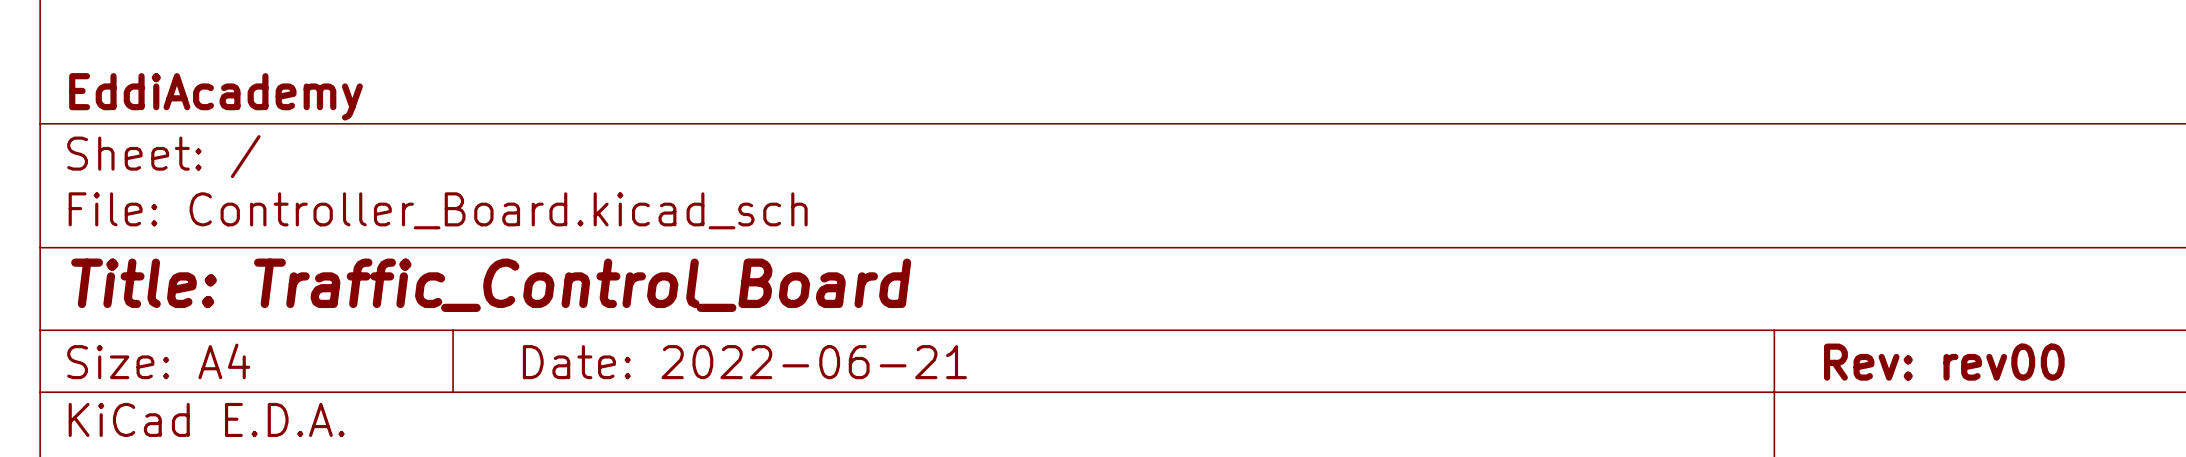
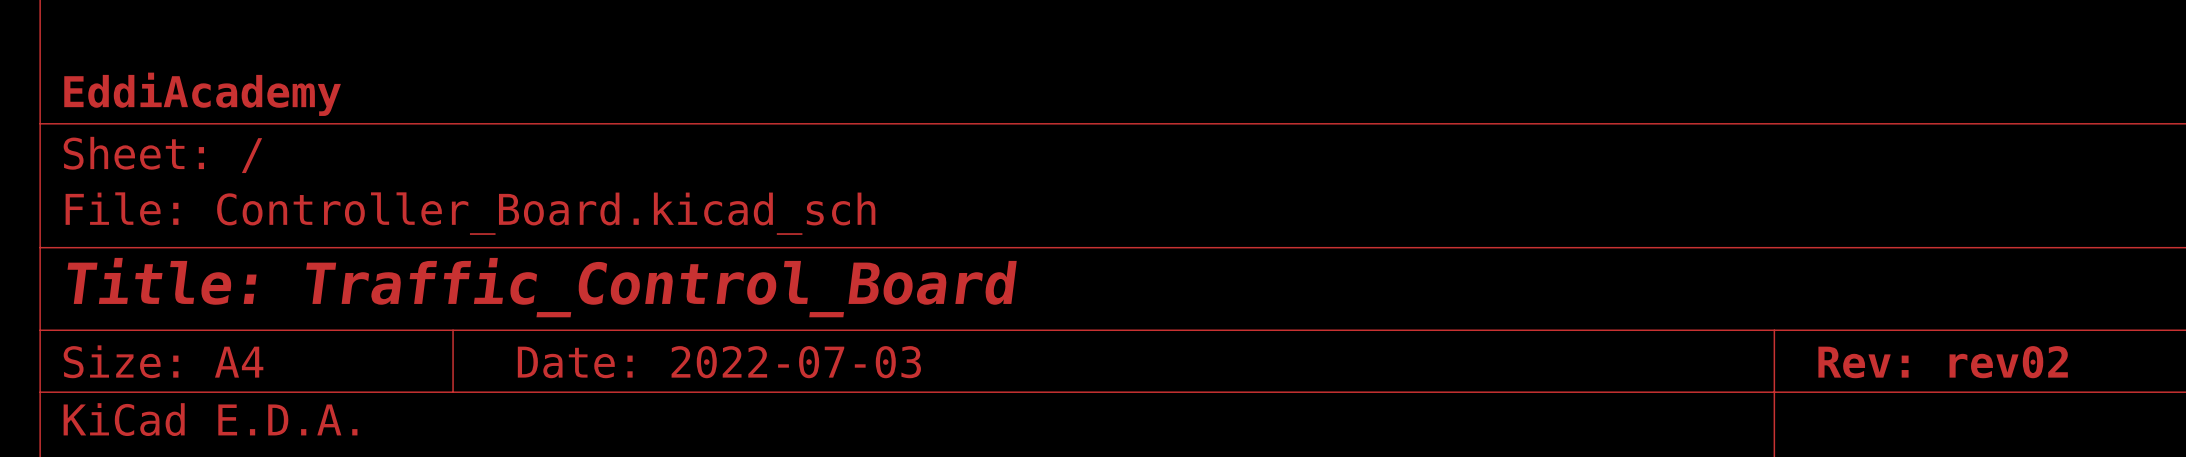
title block: Date: 2022-06-21 (744, 362) -> Date: 2022-07-03 (719, 362)
title block: Rev: rev00 (1944, 362) -> Rev: rev02 (1943, 362)

